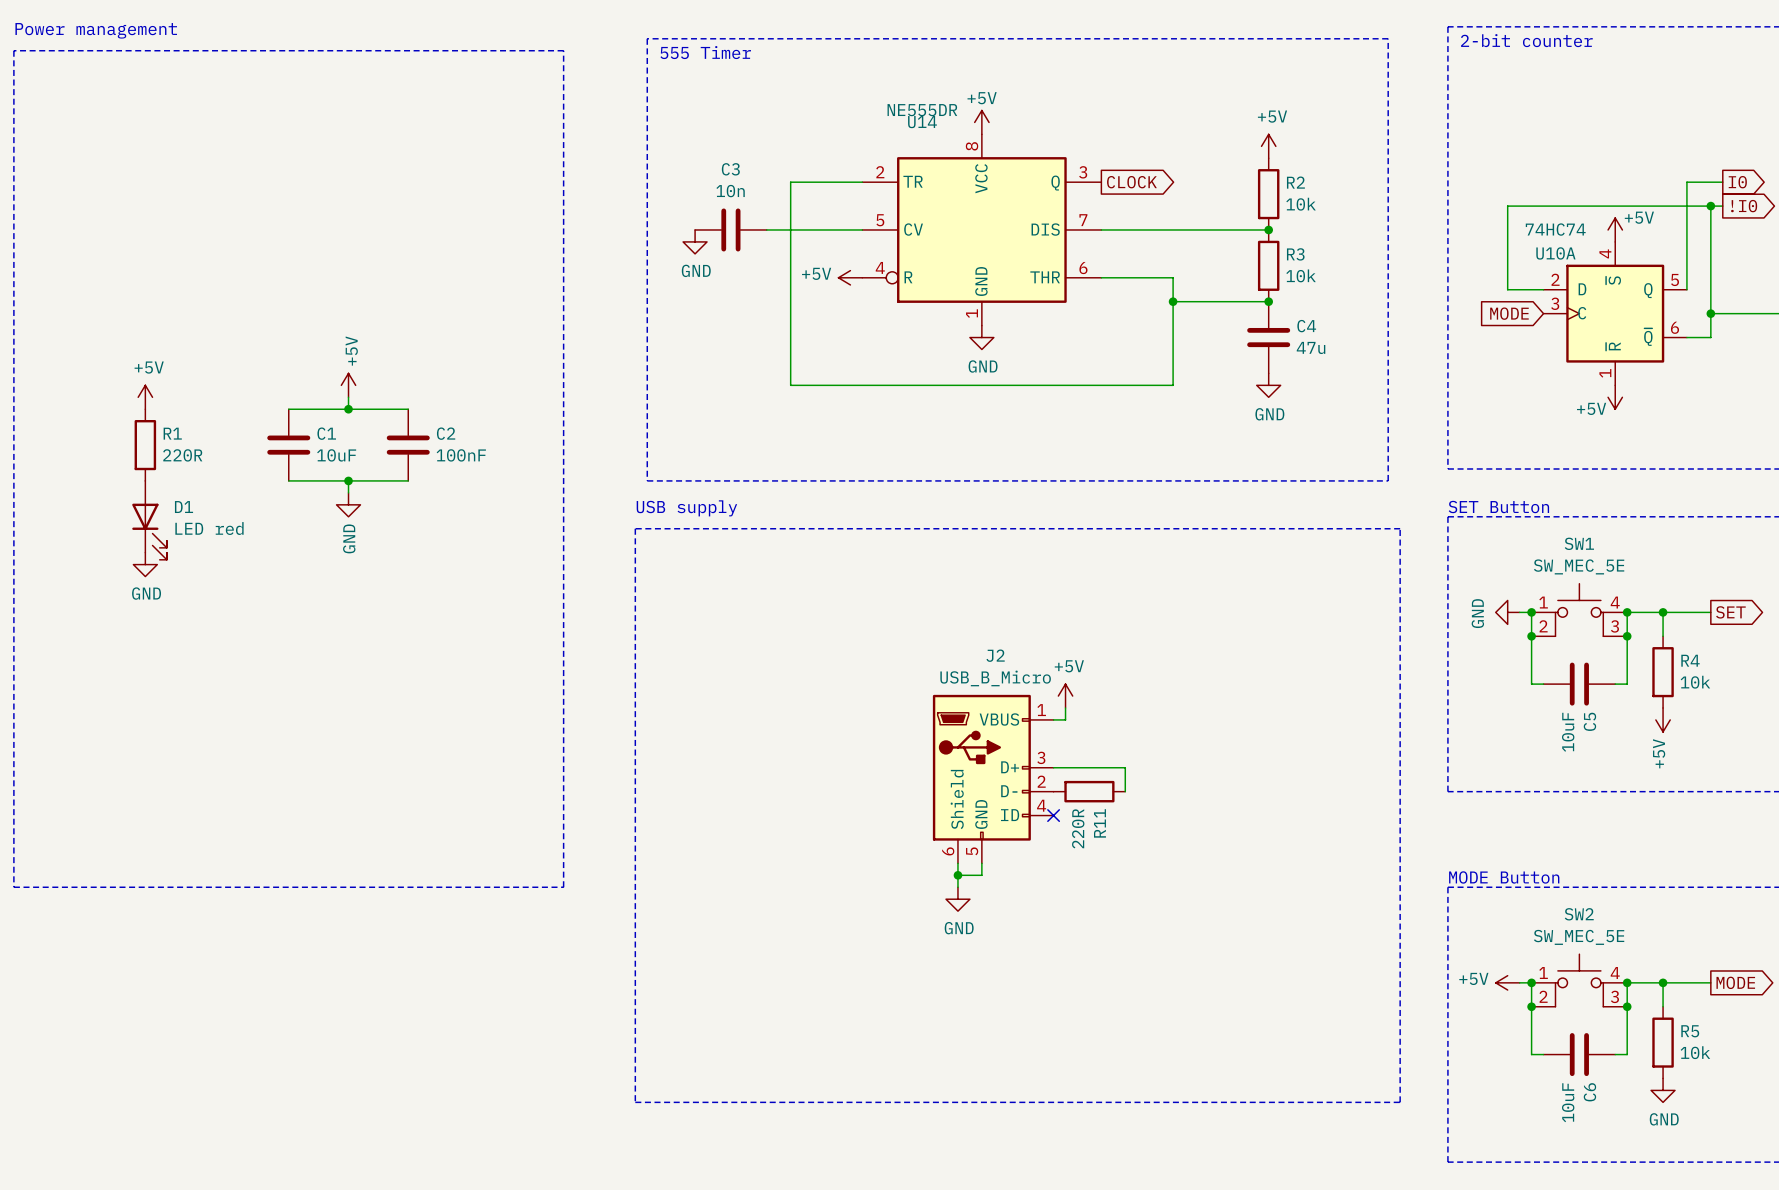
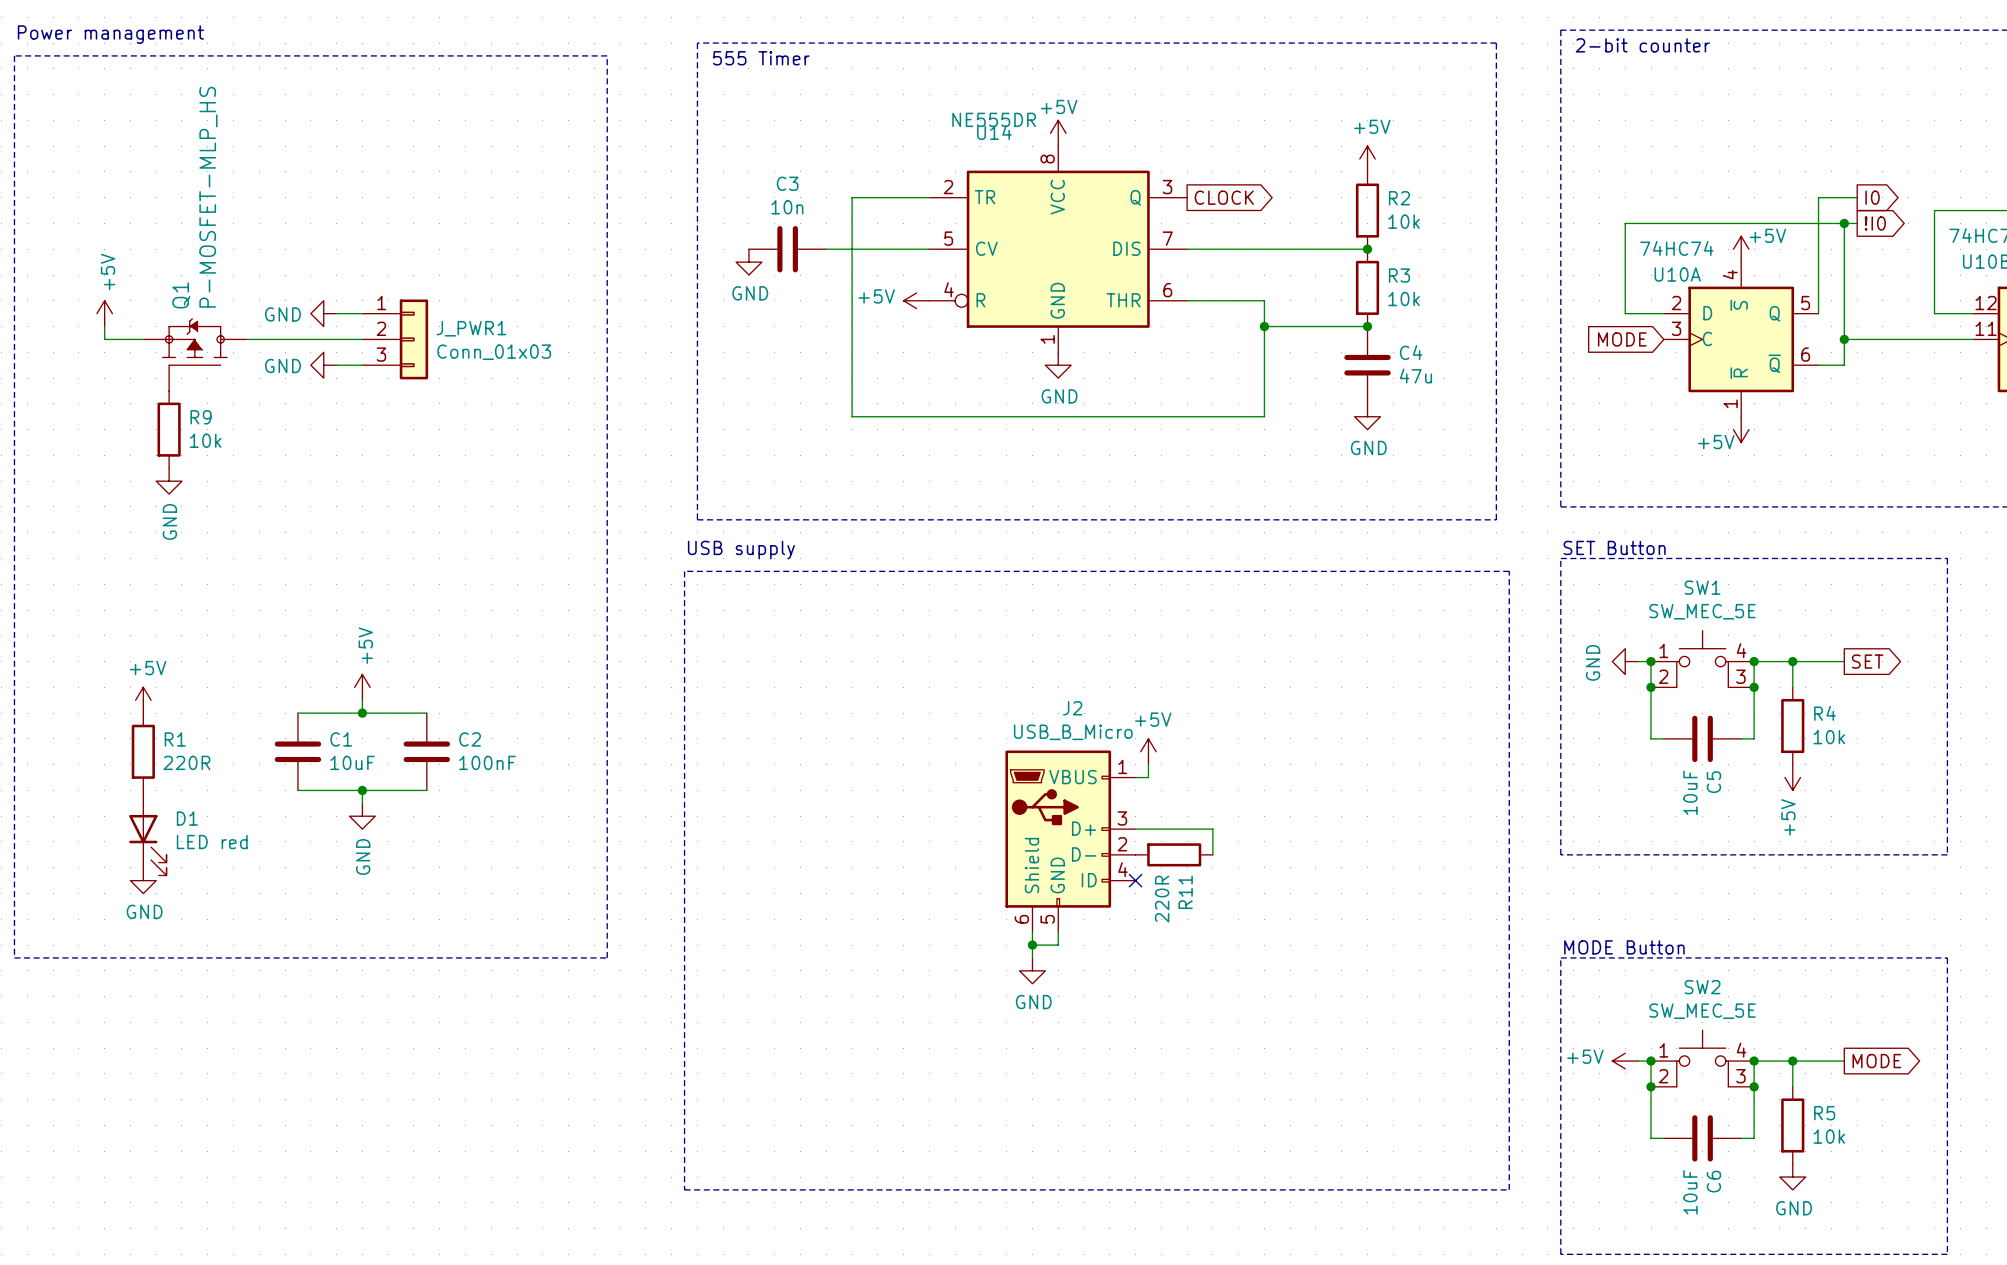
power symbol: none -> GND (323, 313)
wire: none -> (336, 313) (362, 313)
wire: none -> (104, 326) (104, 339) (143, 339)
wire: none -> (246, 339) (362, 339)
J_PWR1: none -> Conn_01x03 (395, 339)
Q1: none -> P-MOSFET-MLP_HS (194, 354)
power symbol: none -> GND (323, 365)
wire: none -> (336, 365) (362, 365)
power symbol text rotation: 0° (149, 367) -> 90° counterclockwise (108, 271)
power symbol: +5V (348, 385) -> none
power symbol position: +5V (145, 397) -> +5V (104, 313)
R9: none -> 10k (169, 429)
wire: (348, 397) (348, 409) -> none
wire: (288, 409) (408, 409) -> none
junction: (348, 409) -> none
R1 position: (145, 445) -> (143, 751)
power symbol: none -> GND (169, 481)
C1 position: (288, 445) -> (297, 751)
C2 position: (408, 445) -> (426, 751)
wire: (288, 480) (408, 480) -> (297, 713) (426, 713)
wire: (348, 480) (348, 492) -> (362, 700) (362, 713)
junction: (348, 480) -> none
power symbol: GND (348, 504) -> none
D1 position: (149, 520) -> (147, 832)
power symbol: GND (145, 564) -> none
power symbol: none -> +5V (362, 687)
power symbol: none -> +5V (143, 700)
junction: none -> (362, 713)
wire: none -> (297, 790) (426, 790)
wire: none -> (362, 790) (362, 803)
junction: none -> (362, 790)
power symbol: none -> GND (362, 816)
power symbol: none -> GND (143, 880)

